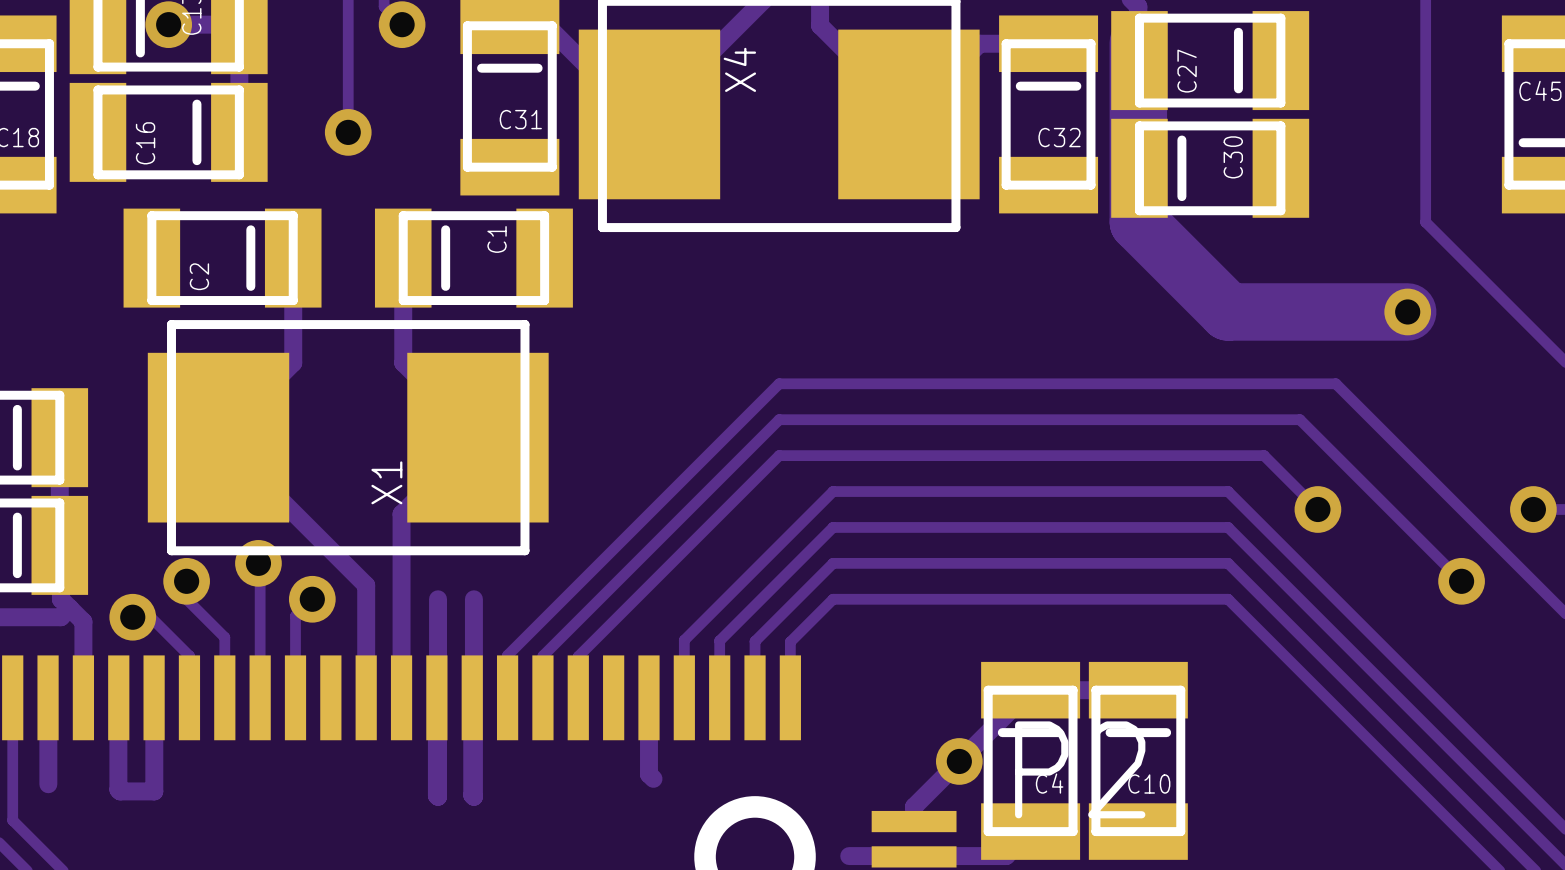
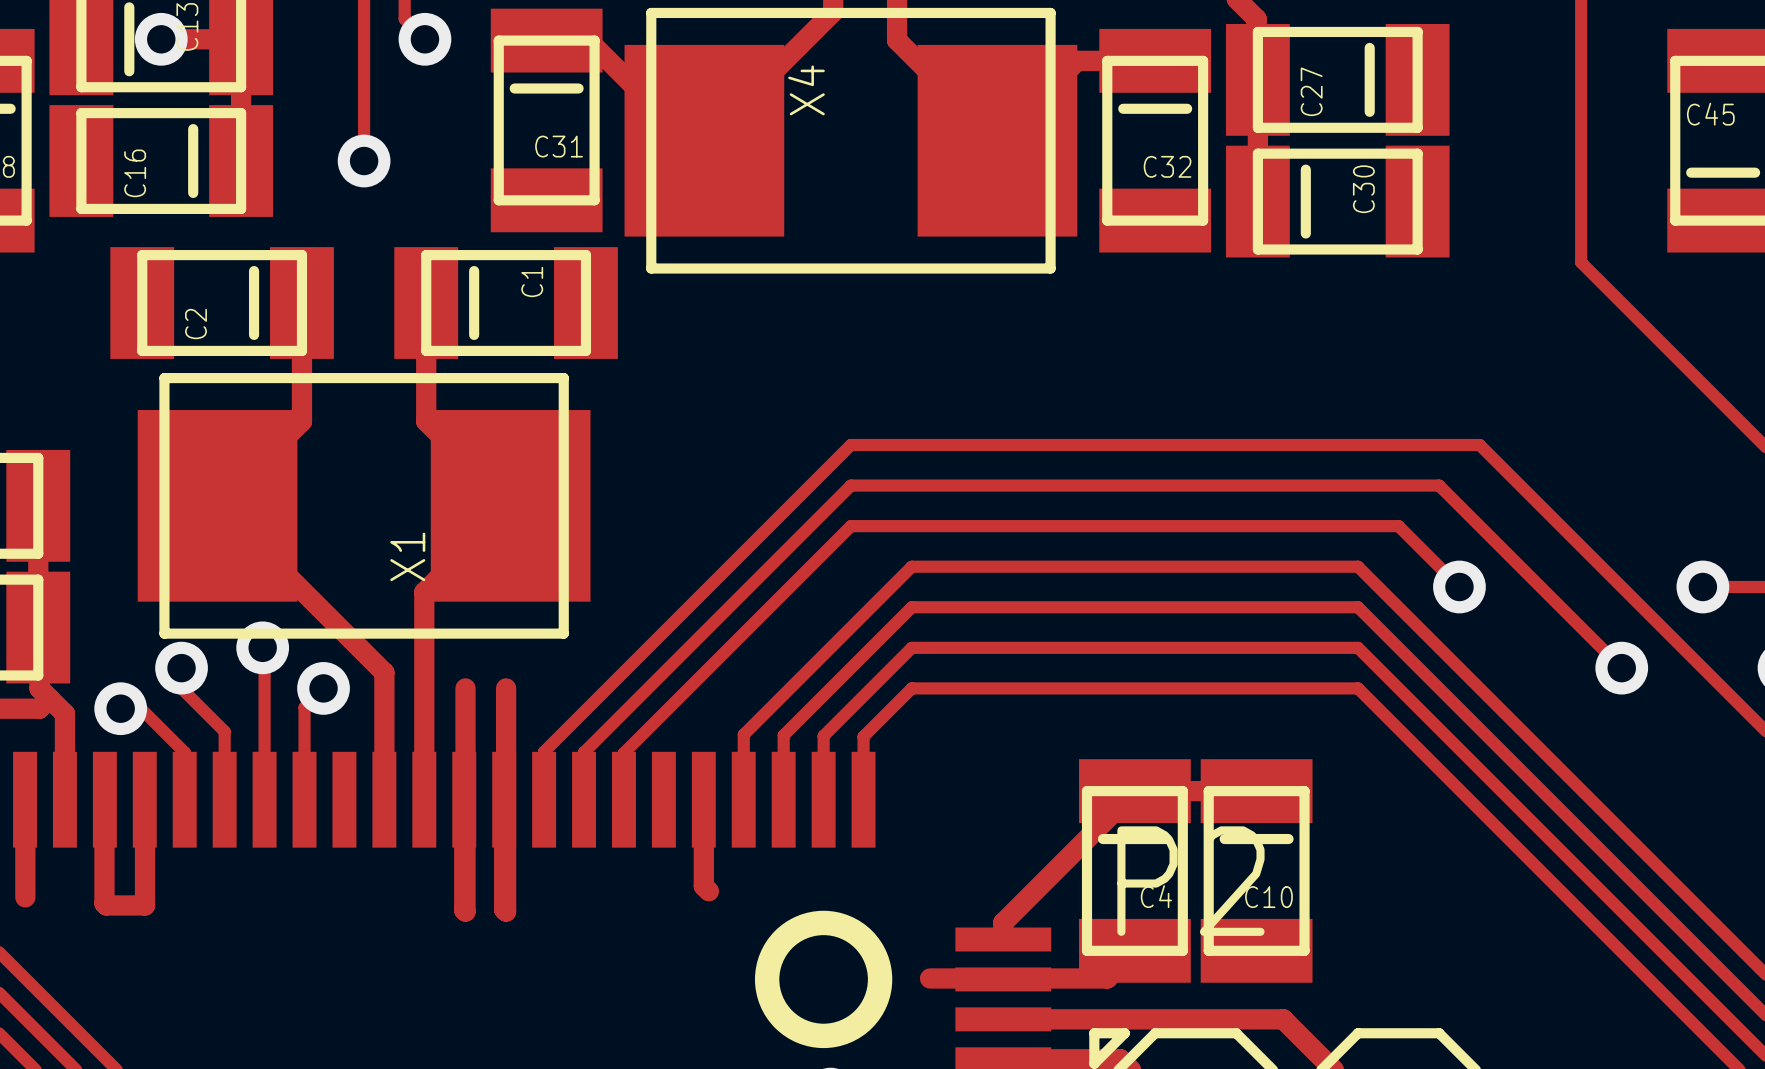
track: (1138, 42) (1138, 222) (1228, 311) (1407, 311) -> none
via: (1407, 311) -> none
via: (959, 761) -> none

